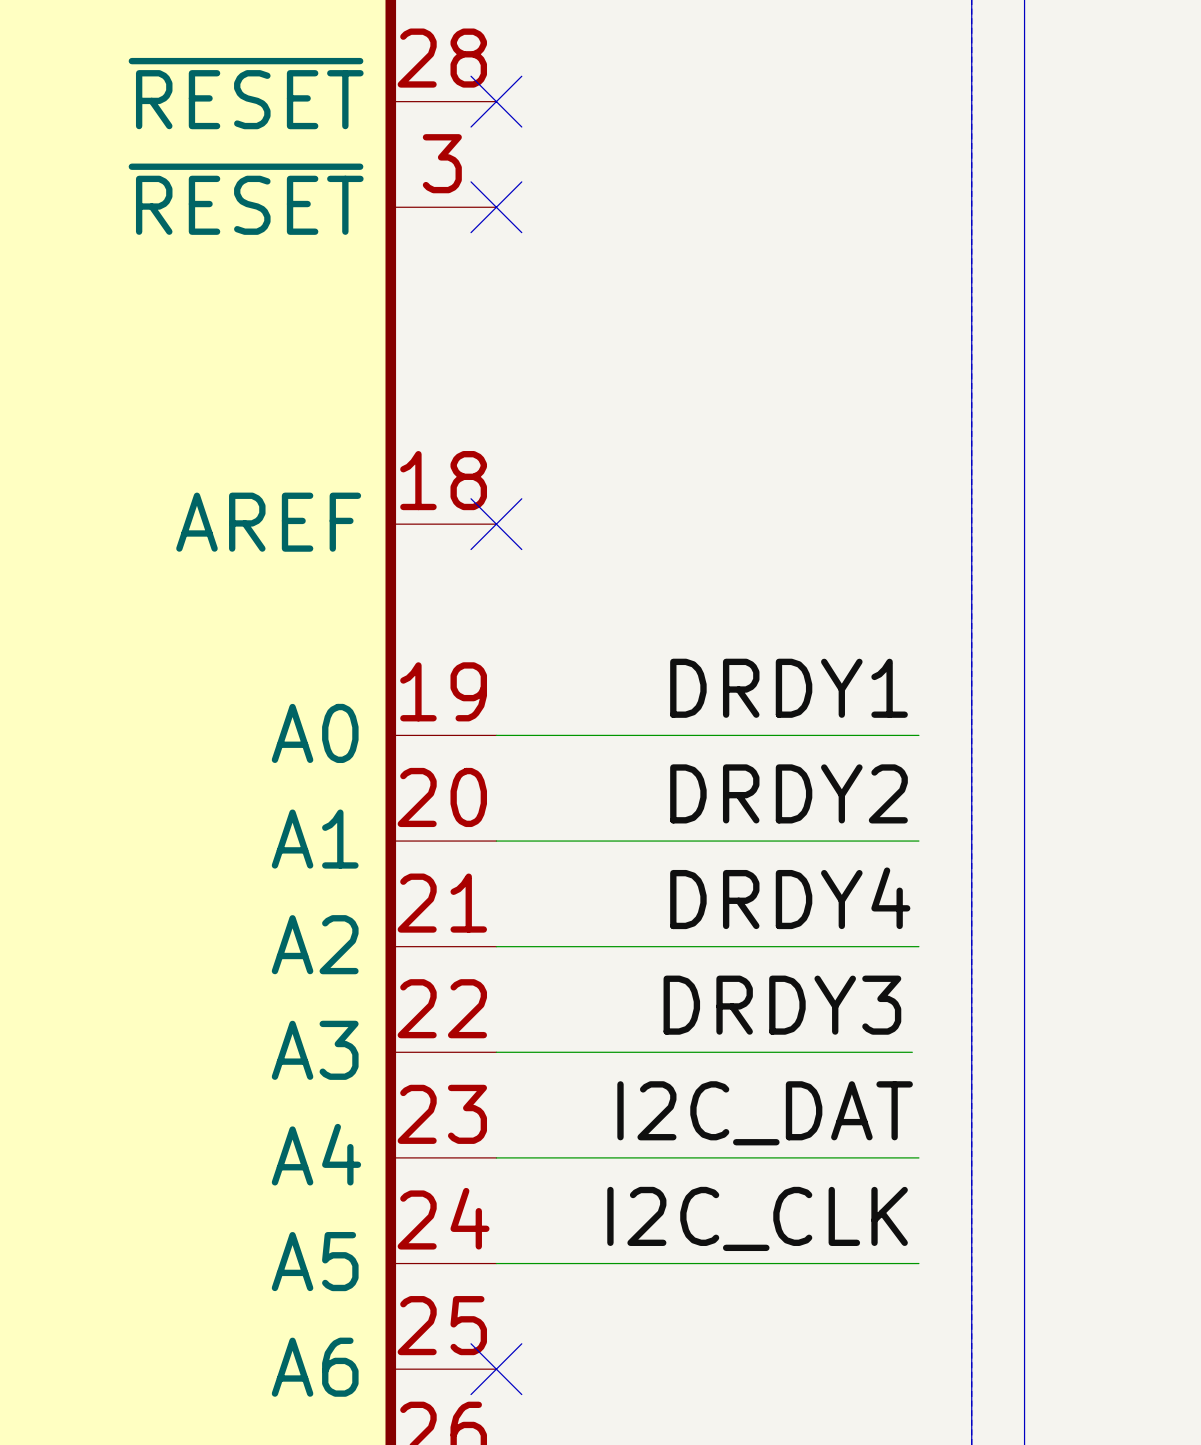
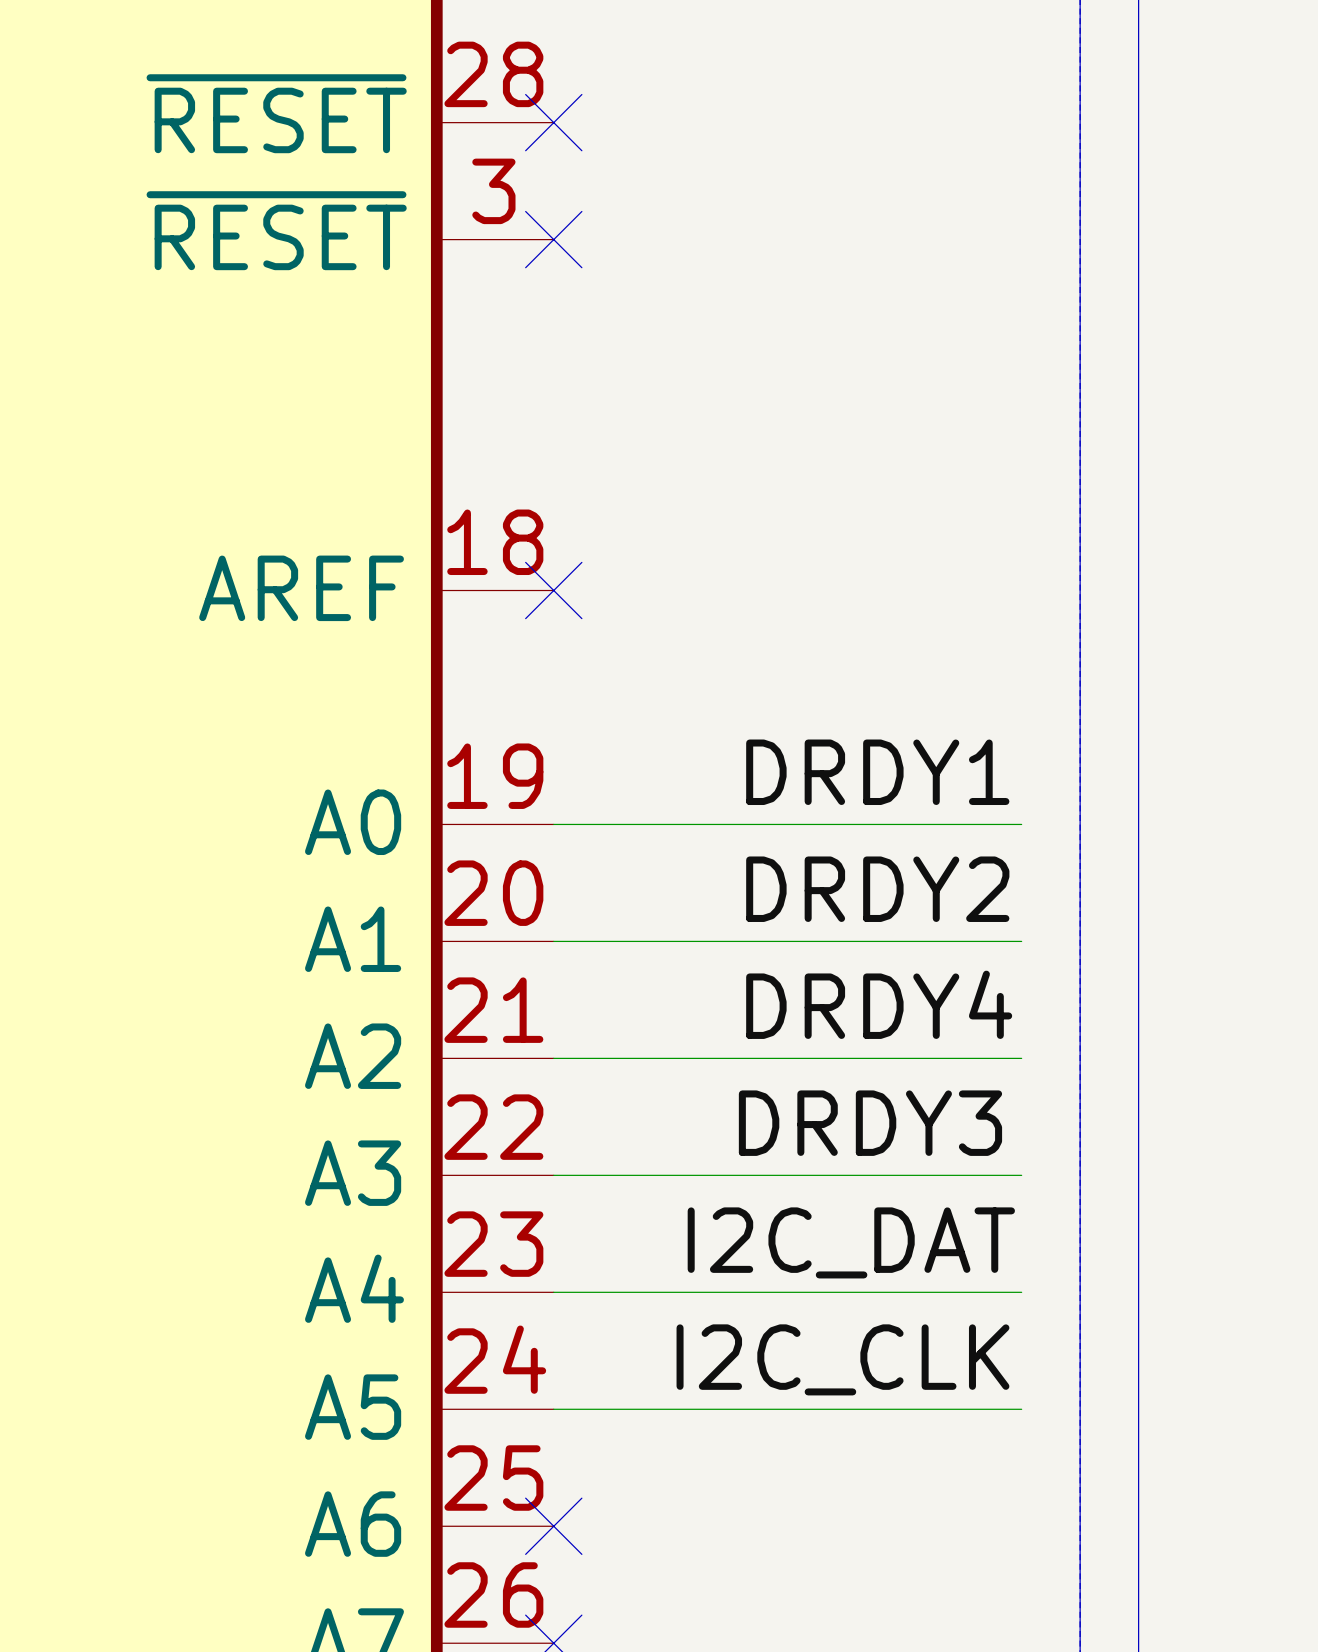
wire: none -> (1014, 1175) (1021, 1175)

